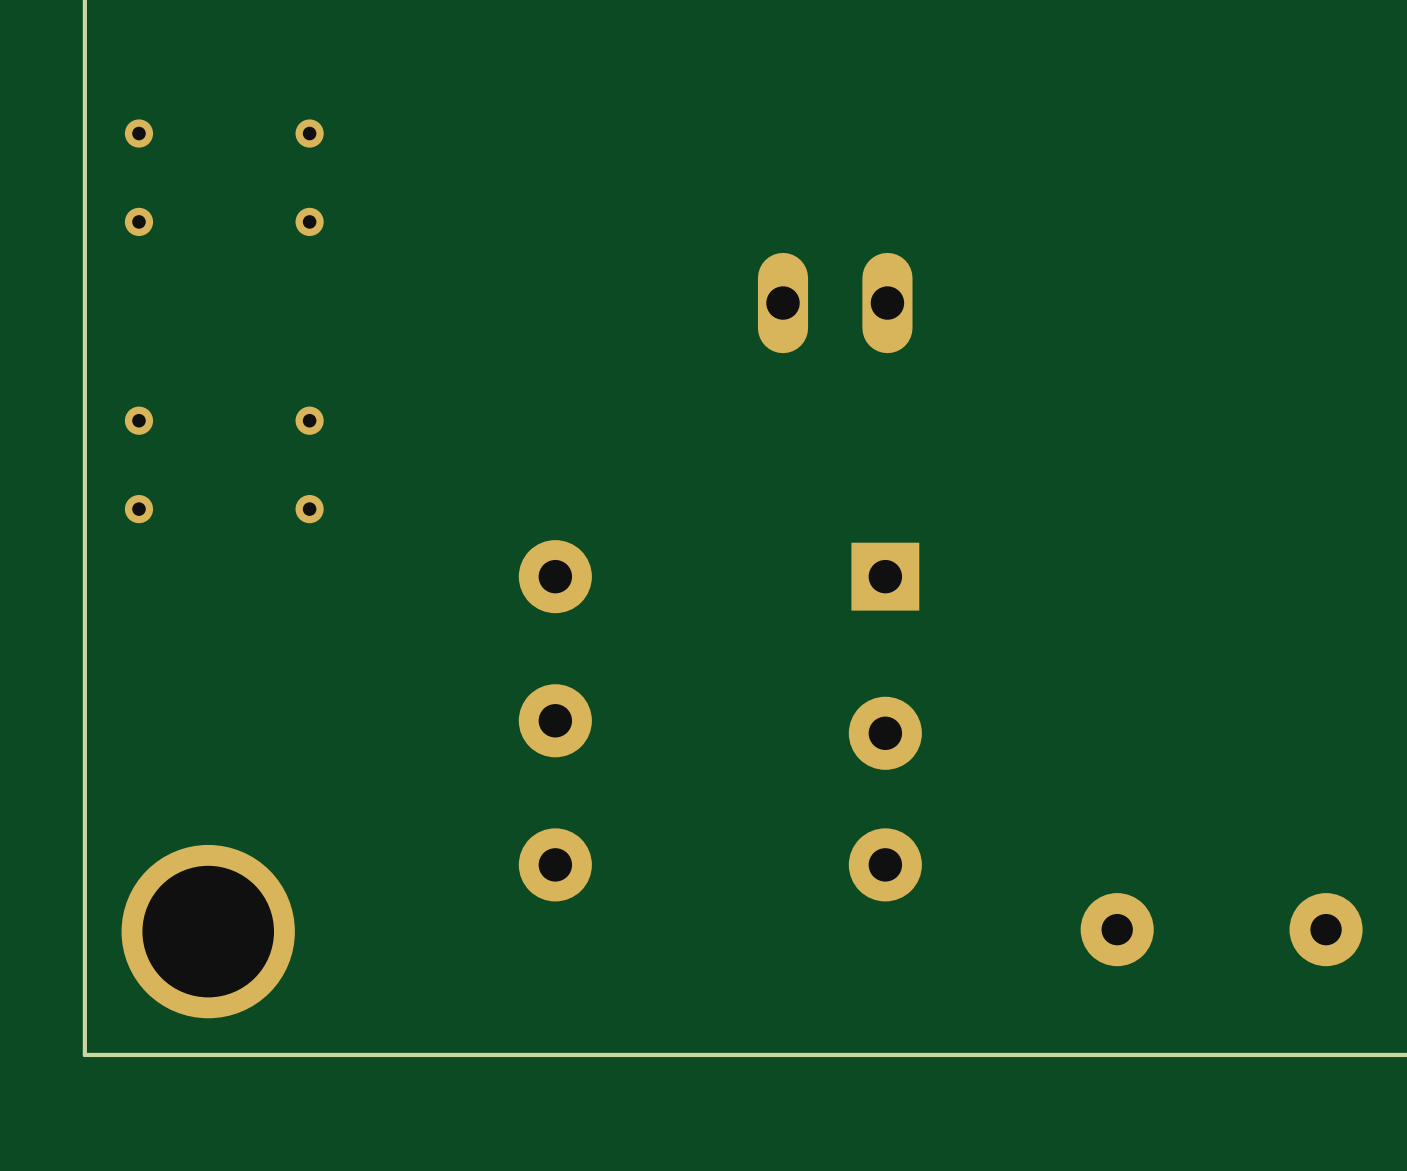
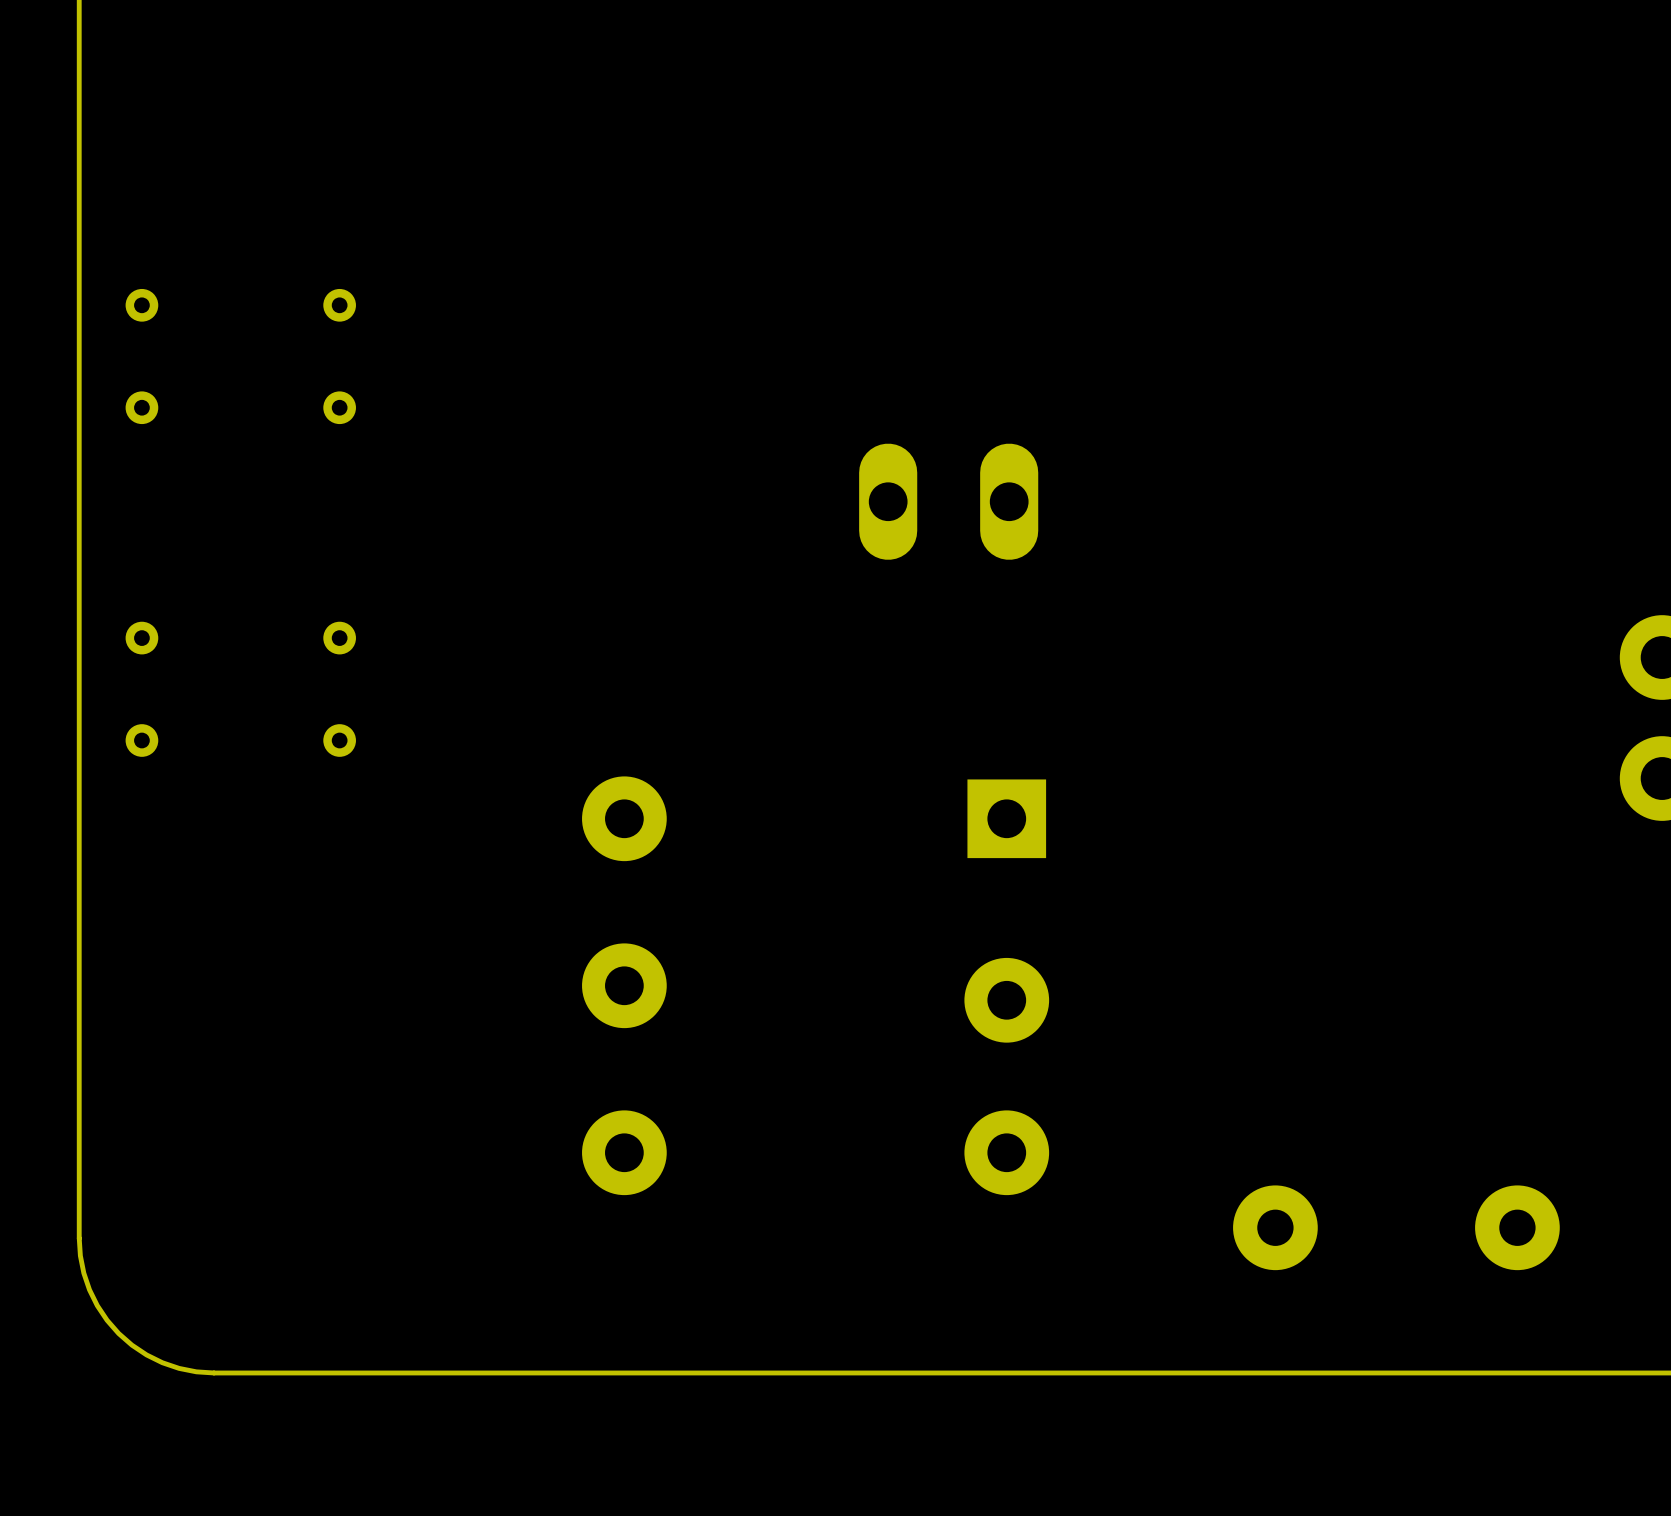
part: (208, 931) -> none
board edge: (84, 938) (84, 1054) (201, 1054) -> (79, 1238) (80, 1255) (89, 1289) (97, 1305) (118, 1333) (146, 1354) (162, 1362) (196, 1371) (213, 1372)

